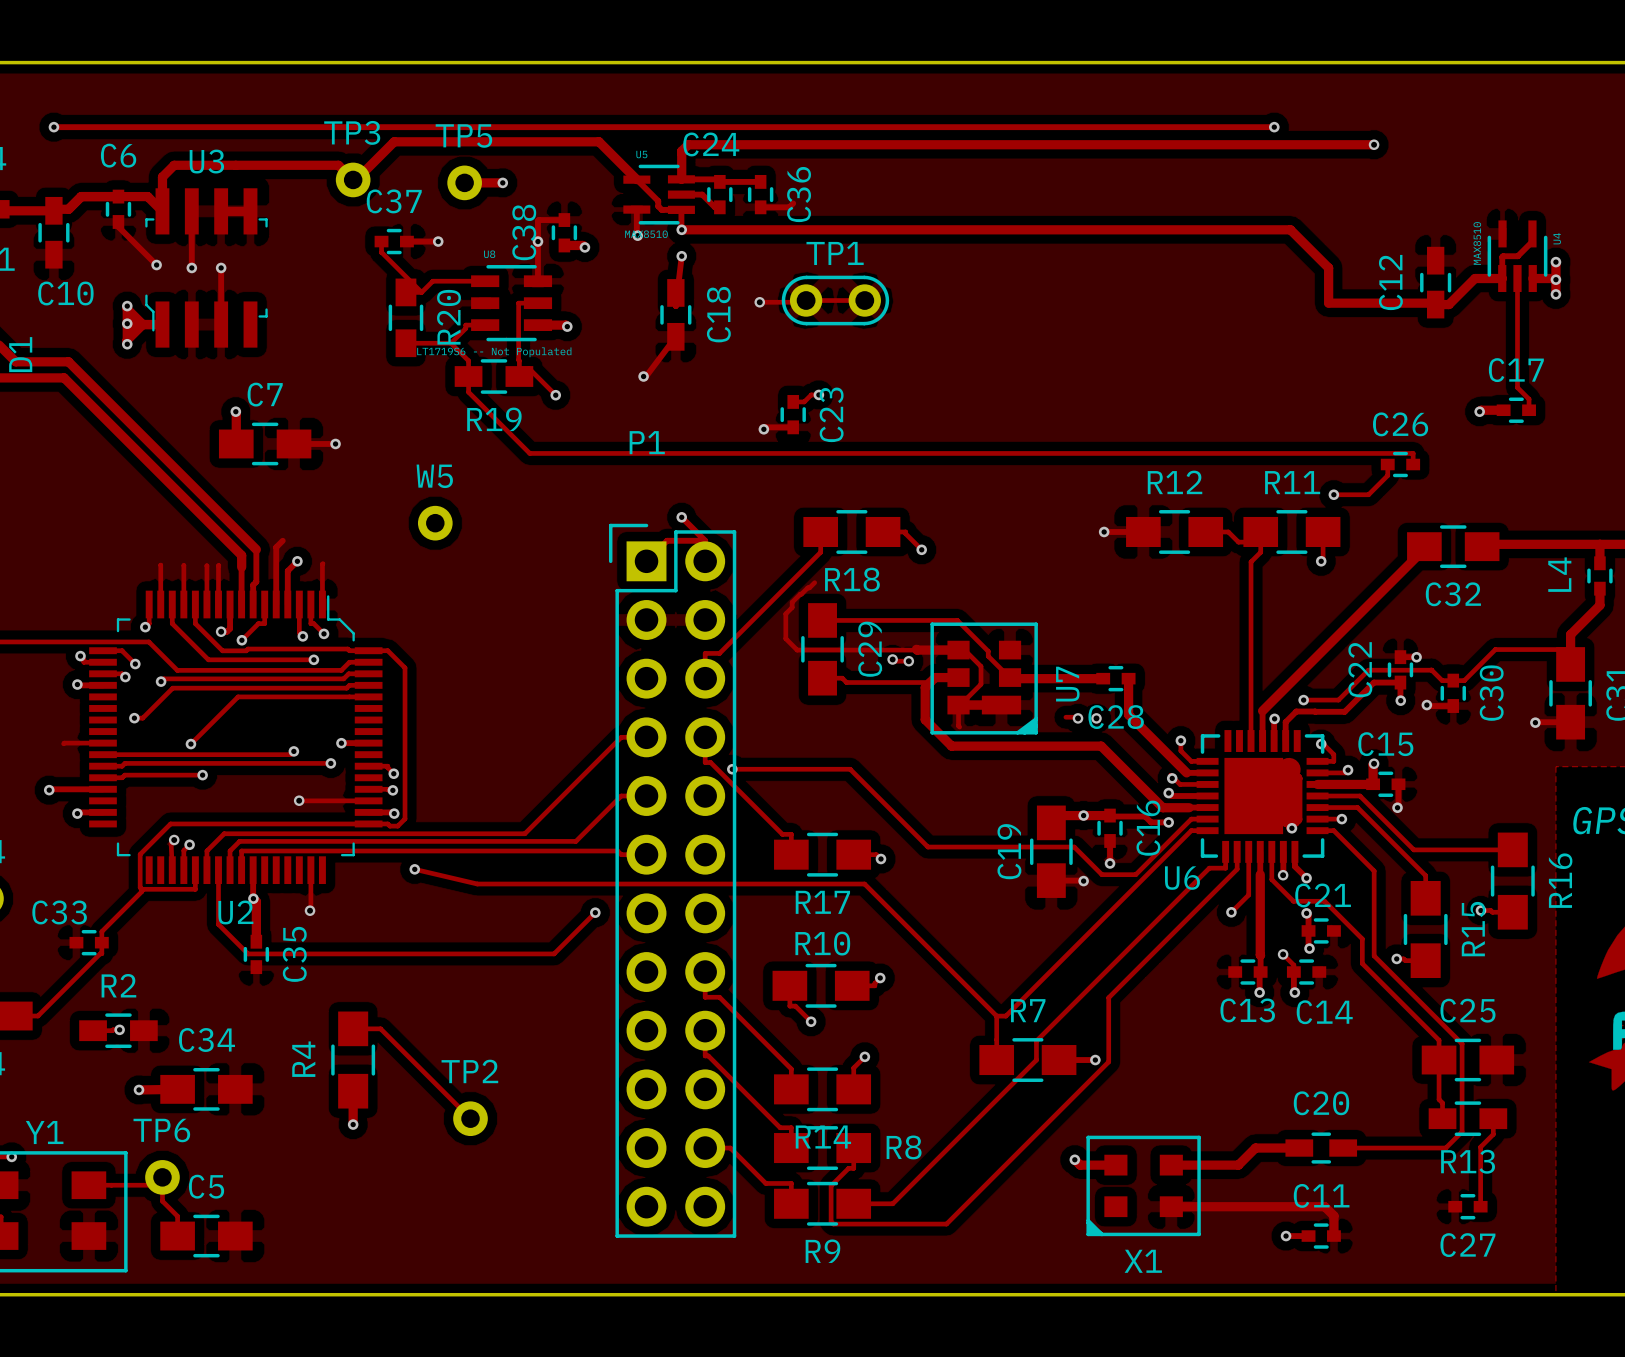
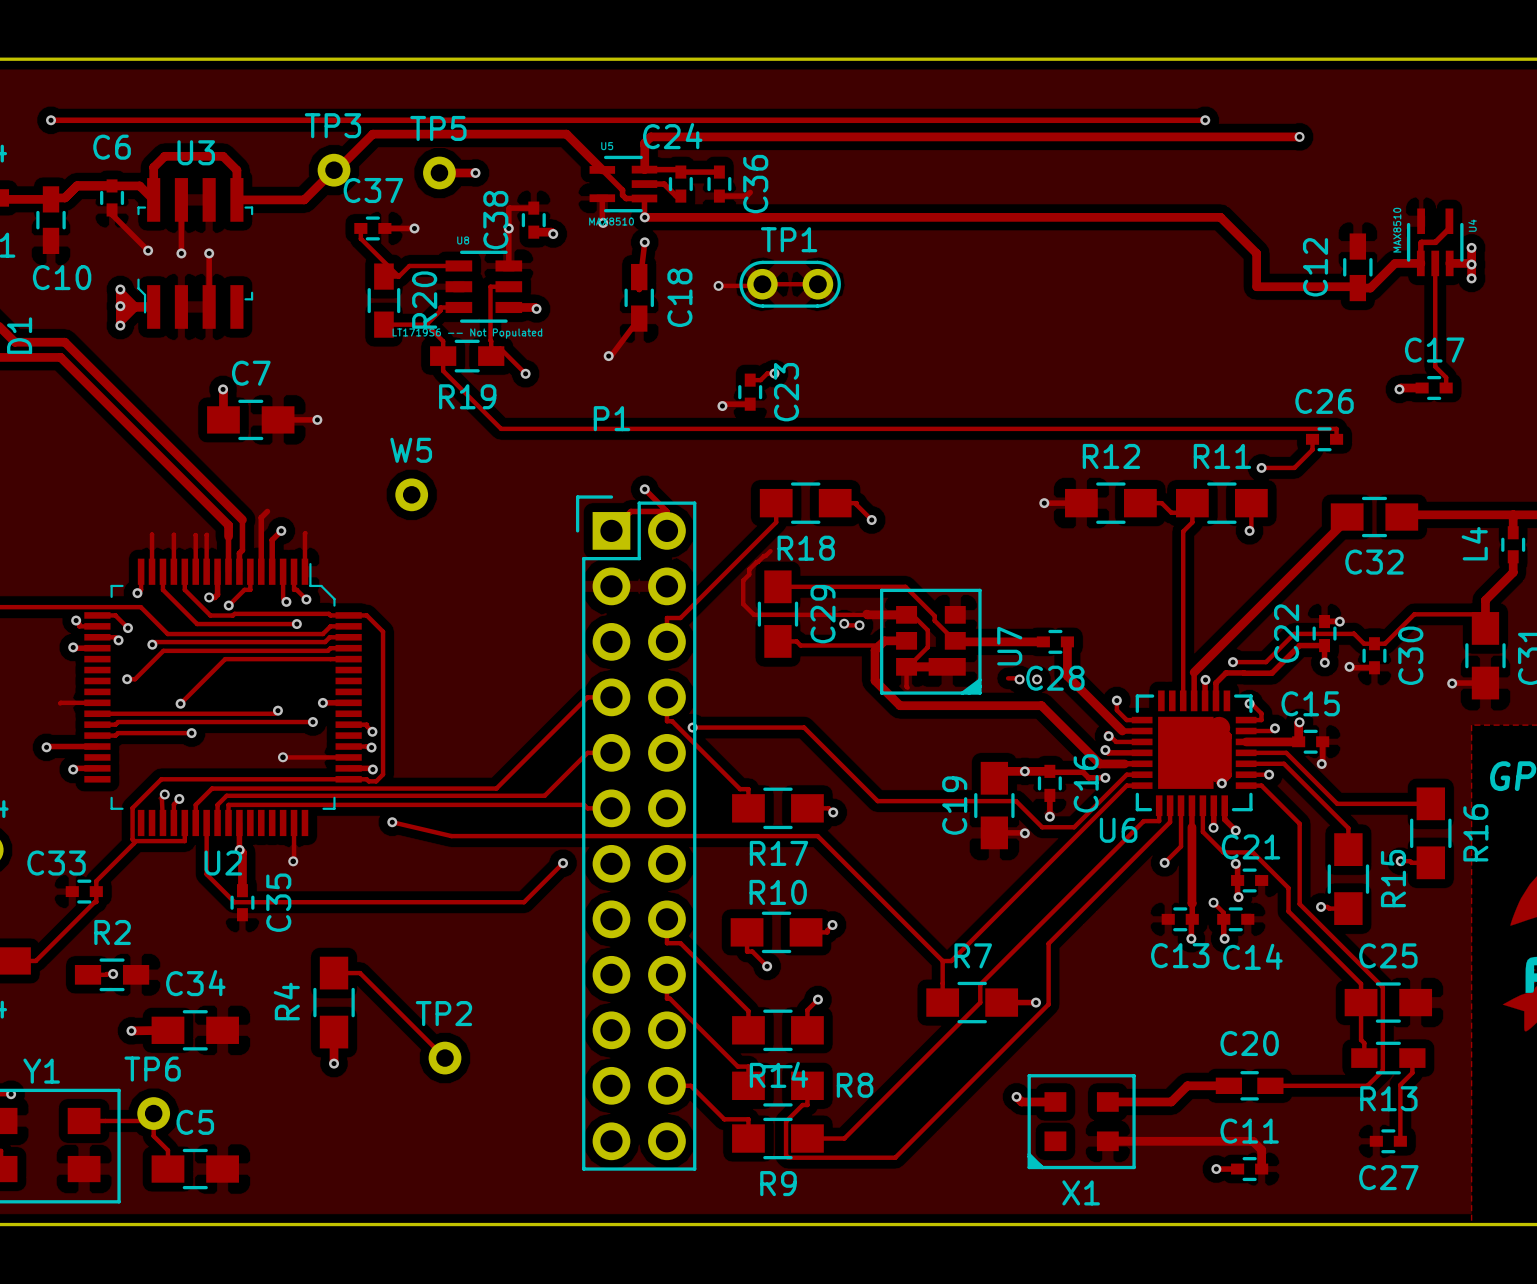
track: (235, 165) (338, 165) (353, 179) -> (223, 156) (236, 170) (236, 199) (304, 199) (334, 170)
track: (221, 211) (250, 211) -> none

